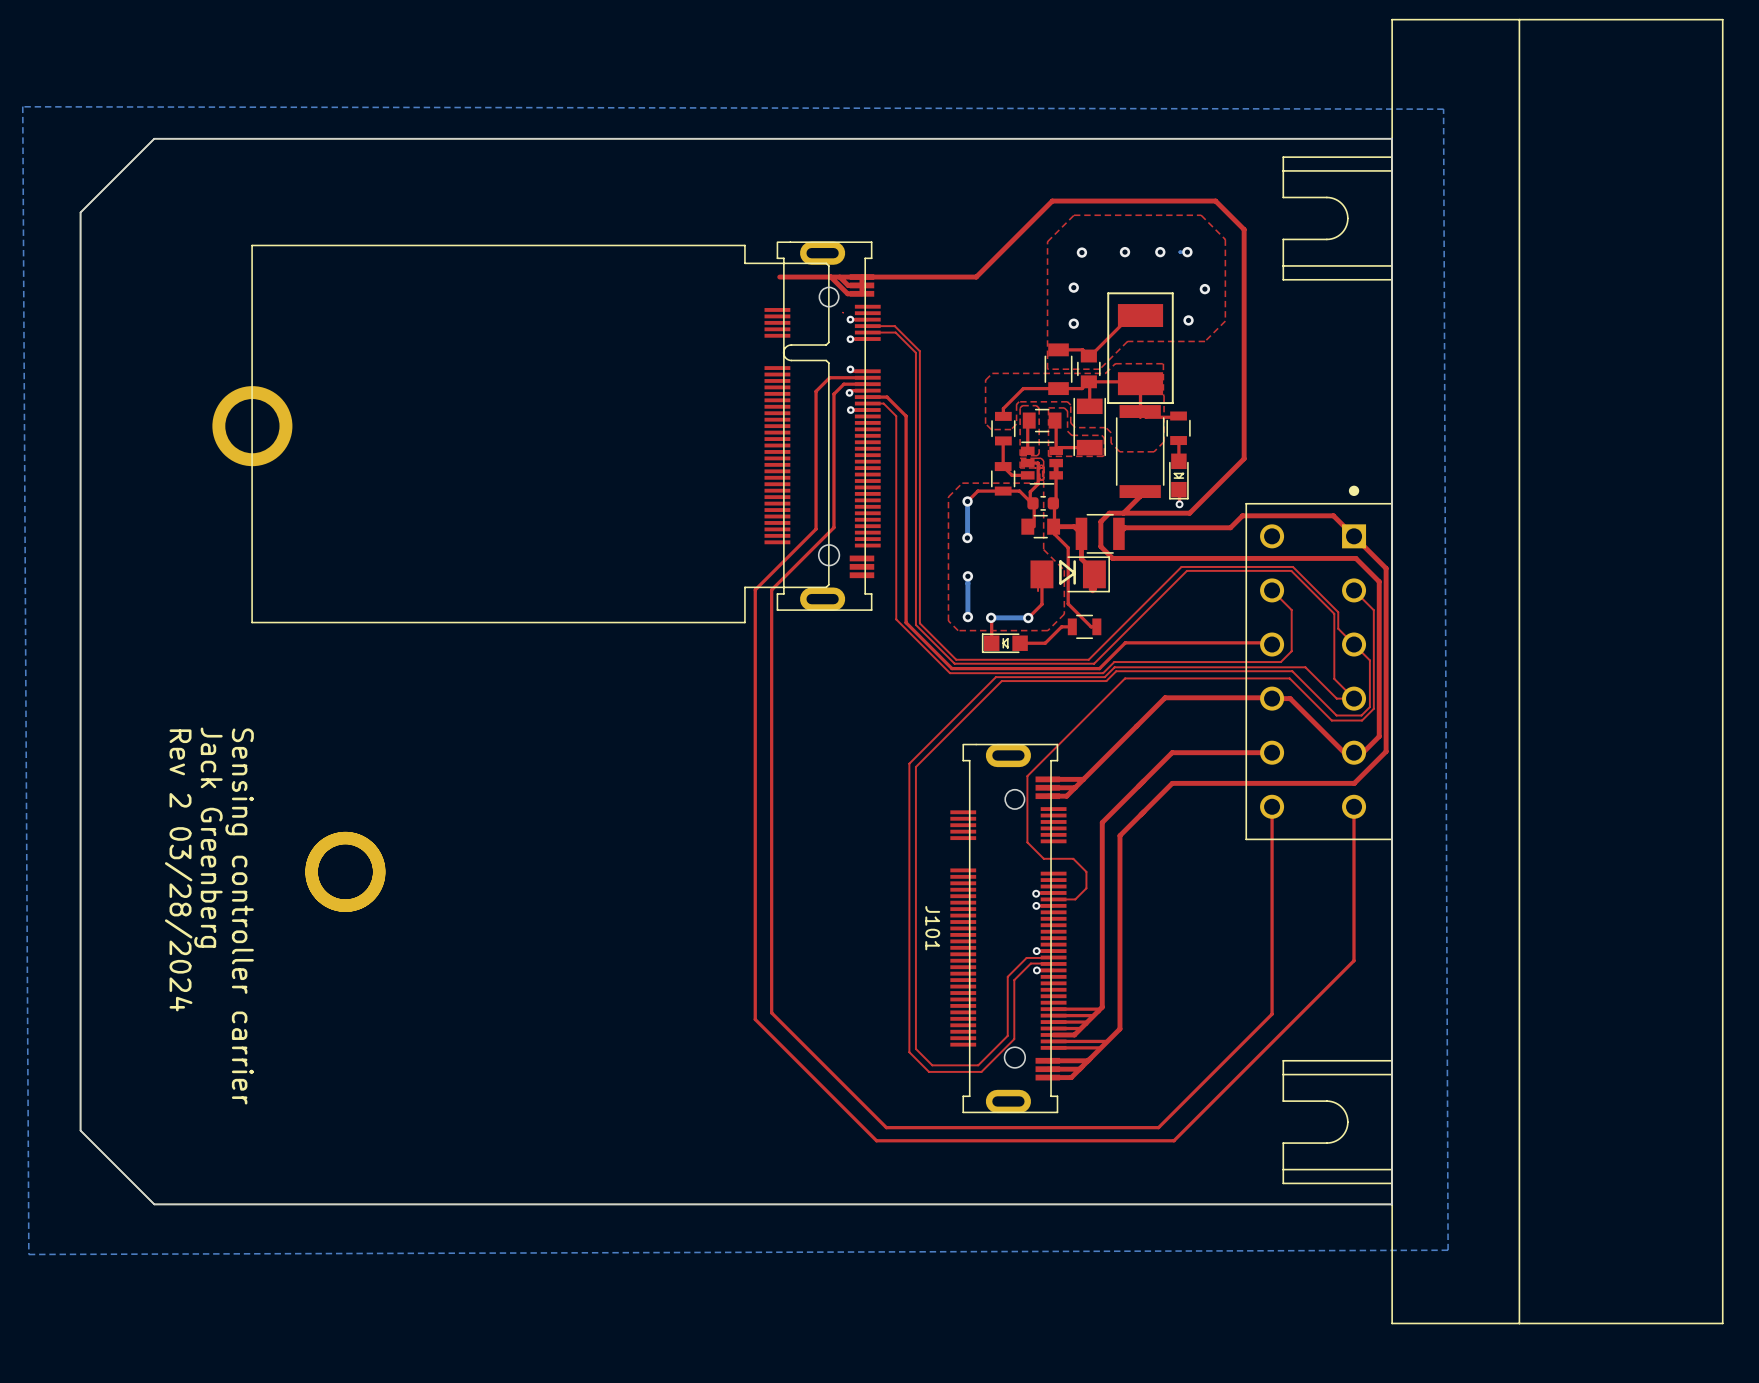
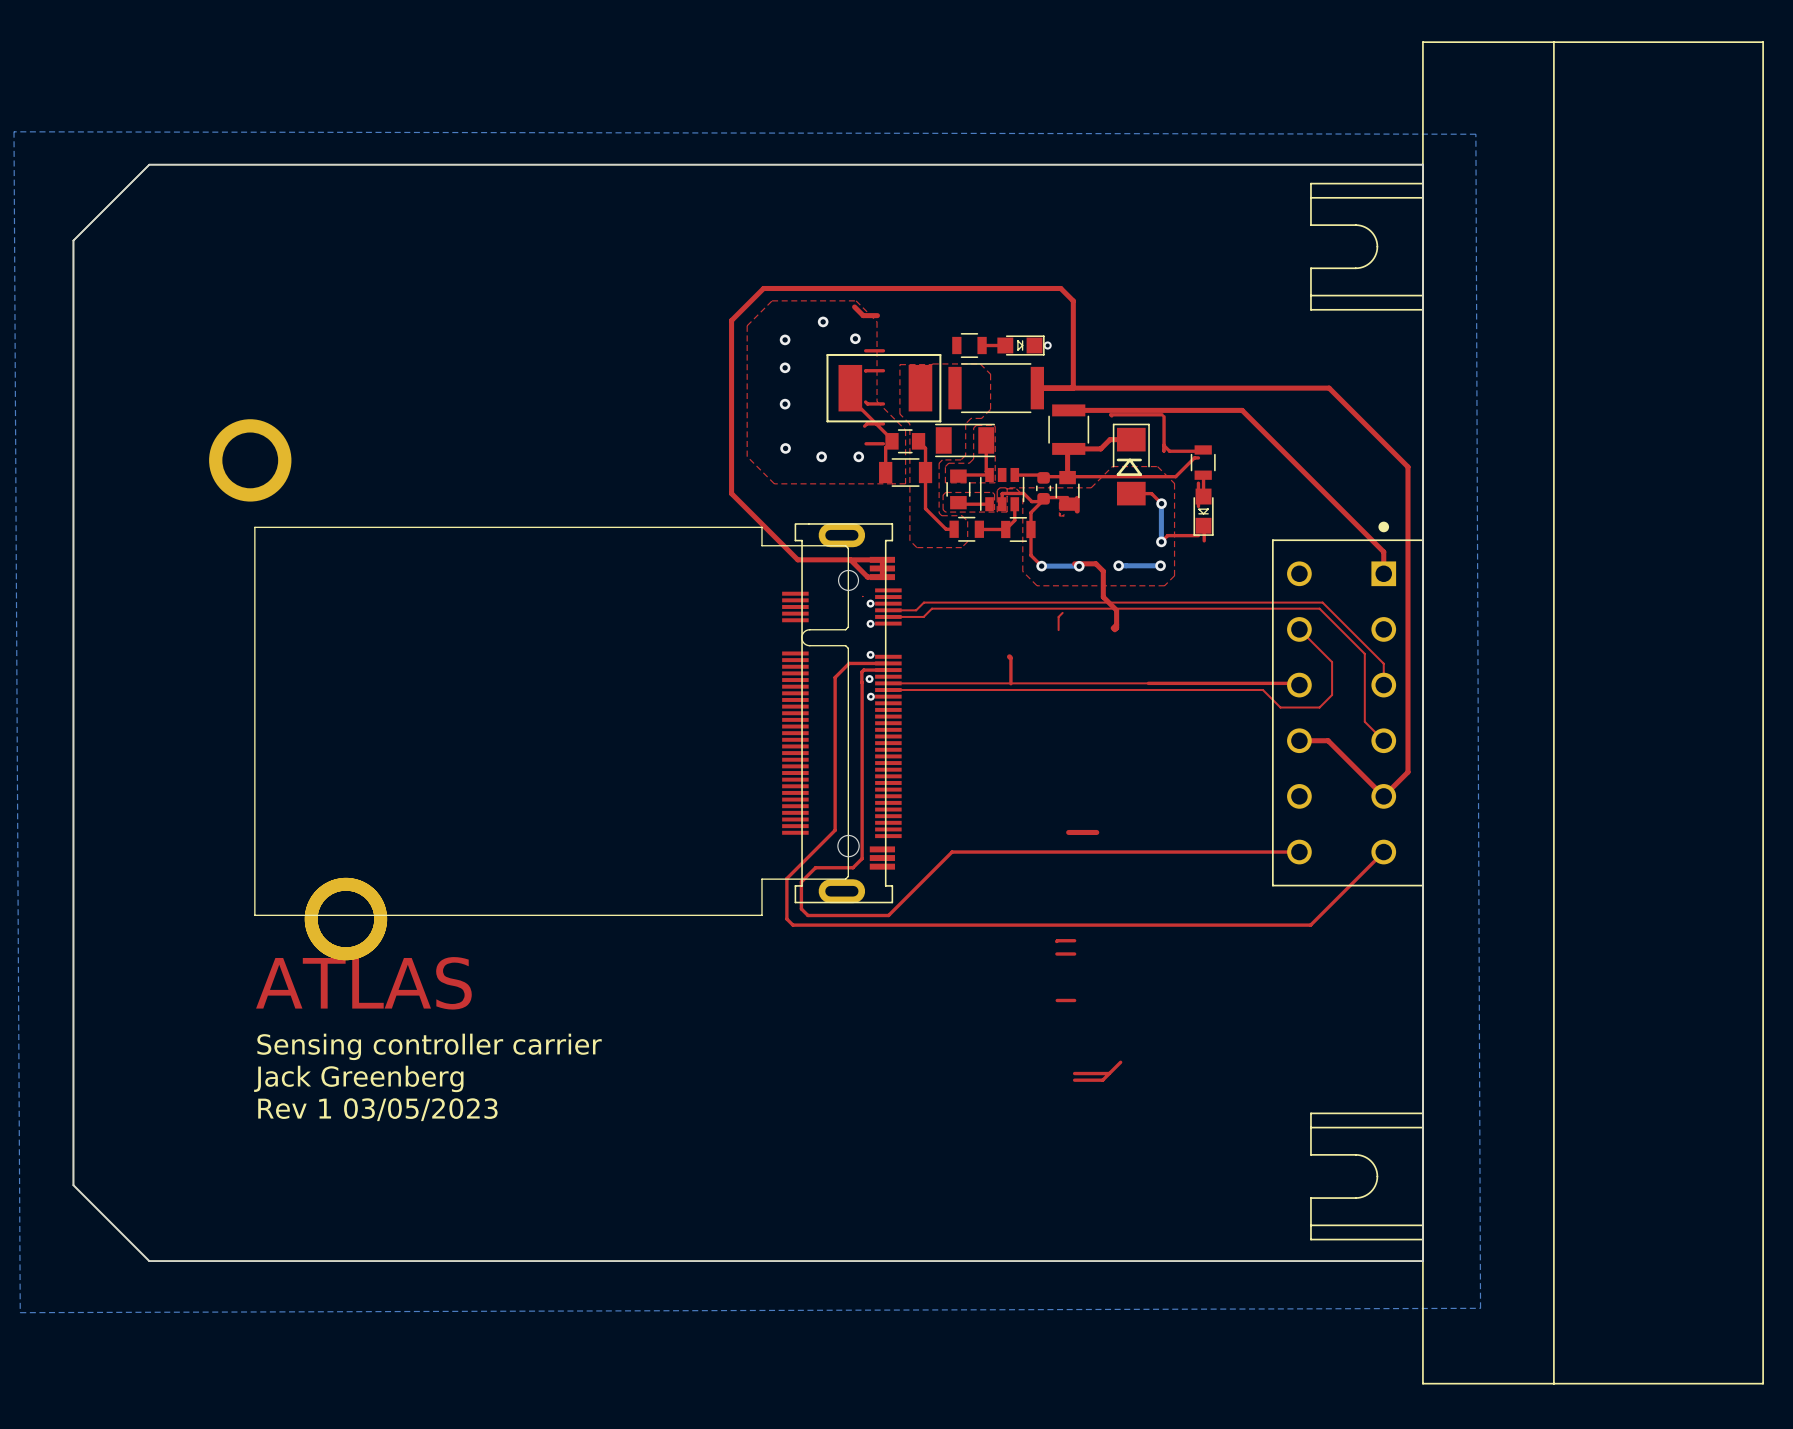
top zone outline: (1074, 215) (1047, 241) (1047, 369) (1099, 369) (1127, 341) (1205, 341) (1225, 321) (1225, 239) (1201, 215) (1074, 215) -> none
line: (252, 245) (744, 245) (744, 263) (826, 263) (828, 265) (828, 342) (826, 345) (789, 345) (785, 348) (783, 352) (785, 357) (789, 360) (826, 360) (828, 363) (828, 584) (826, 587) (744, 587) (744, 622) (252, 622) (252, 245) -> none
via: (1081, 252) -> none
via: (1124, 252) -> none
via: (1160, 252) -> none
bottom track: (1180, 252) (1187, 252) -> none
via: (1187, 252) -> none
top zone outline: none -> (772, 300) (747, 325) (747, 456) (774, 483) (905, 483) (905, 430) (877, 401) (877, 321) (856, 300) (772, 300)
top track: (779, 277) (976, 277) (1052, 201) (1215, 201) (1244, 229) (1244, 458) (1189, 513) (1109, 513) (1100, 521) (1100, 546) (1112, 558) (1355, 558) (1379, 581) (1379, 736) (1363, 752) (1344, 752) (1290, 698) -> (1037, 388) (1329, 388) (1407, 466) (1407, 772) (1383, 796) (1328, 740) (1318, 740)
top track: (830, 277) (847, 293) (861, 293) (861, 277) -> none
via: (1073, 287) -> none
via: (1204, 289) -> none
via: none -> (823, 321)
via: none -> (855, 338)
via: none -> (785, 339)
top zone outline: (842, 313) (842, 313) -> (862, 596) (862, 596)
part: none -> (969, 345)
top track: none -> (982, 345) (1005, 345)
part: none -> (1021, 345)
via: none -> (1047, 345)
top track: (1140, 315) (1130, 315) (1090, 356) (1082, 349) (1058, 349) -> none
via: (850, 319) -> none
via: (1188, 320) -> none
via: (1073, 323) -> none
top track: (867, 326) (894, 326) (919, 351) (919, 623) (956, 659) (1088, 659) (1181, 566) (1293, 566) (1338, 612) (1338, 628) (1369, 660) (1369, 707) (1361, 715) (1336, 715) (1292, 671) (1116, 671) (1106, 681) (1001, 681) (915, 766) (915, 1048) (932, 1065) (978, 1065) (1007, 1035) (1007, 976) (1026, 957) (1053, 957) -> none
top track: (867, 332) (895, 332) (915, 352) (915, 624) (954, 663) (1094, 663) (1186, 570) (1291, 570) (1334, 613) (1335, 680) -> (888, 616) (923, 616) (931, 608) (1319, 608) (1364, 653) (1364, 721)
top zone outline: none -> (932, 363) (980, 363) (990, 374) (990, 409) (981, 418) (970, 418) (965, 423) (965, 455) (961, 459) (942, 459) (939, 463) (939, 513) (941, 515) (962, 515) (967, 521) (967, 541) (961, 547) (916, 547) (909, 540) (909, 424) (899, 414) (899, 364) (932, 363)
via: none -> (785, 367)
via: (850, 339) -> none
part rotation: 0° (1140, 348) -> 90° counterclockwise (883, 388)
part position: (1140, 348) -> (883, 388)
top track: none -> (850, 388) (850, 397) (891, 439) (885, 447) (885, 472)
top track: none -> (1073, 388) (1073, 300) (1060, 288) (763, 288) (731, 320) (731, 493) (797, 559) (882, 559) (882, 577) (867, 577) (850, 559)
top zone outline: (1115, 363) (1105, 373) (992, 373) (985, 380) (985, 423) (991, 429) (1011, 429) (1016, 424) (1016, 404) (1019, 401) (1067, 401) (1070, 405) (1070, 423) (1075, 427) (1105, 427) (1111, 432) (1111, 443) (1119, 451) (1154, 451) (1164, 441) (1163, 363) (1115, 363) -> none
part: (1088, 368) -> none
via: (850, 369) -> none
part rotation: 0° (1058, 369) -> 90° clockwise (905, 472)
part position: (1058, 369) -> (905, 472)
via: none -> (785, 404)
top track: (867, 377) (829, 377) (816, 391) (816, 529) (755, 589) (755, 1019) (876, 1140) (1173, 1140) (1353, 960) (1353, 806) -> (888, 663) (849, 663) (835, 677) (835, 830) (786, 878) (786, 919) (792, 925) (1310, 925) (1383, 852)
top track: none -> (1068, 410) (1242, 410) (1383, 551) (1383, 573)
top track: (867, 384) (843, 384) (833, 394) (833, 527) (771, 589) (771, 1012) (886, 1127) (1158, 1127) (1272, 1014) (1272, 806) -> (888, 670) (863, 670) (861, 672) (862, 858) (853, 867) (815, 867) (801, 881) (801, 908) (807, 915) (888, 915) (952, 852) (1299, 852)
via: (849, 392) -> none
top zone outline: none -> (976, 425) (973, 428) (973, 458) (969, 463) (948, 463) (945, 466) (945, 482) (995, 482) (995, 426) (976, 425)
top track: (867, 397) (887, 397) (906, 416) (906, 622) (952, 668) (1099, 668) (1125, 642) -> (888, 683) (1148, 683)
top track: (867, 403) (883, 403) (896, 416) (896, 619) (950, 673) (1103, 673) (1114, 662) (1280, 662) (1291, 651) (1291, 610) -> (888, 690) (1262, 690) (1280, 707) (1319, 707) (1332, 695) (1332, 662) (1319, 649)
top track: none -> (1133, 437) (1131, 439) (1110, 439) (1100, 448) (1068, 448) (1067, 477)
top zone outline: (1022, 405) (1020, 407) (1020, 455) (1037, 455) (1039, 453) (1039, 408) (1036, 405) (1022, 405) -> none
top track: (1089, 406) (1088, 381) (1082, 388) (1023, 388) (1003, 408) (1003, 416) (999, 416) -> none
part: none -> (905, 441)
top track: none -> (918, 441) (925, 448) (925, 508) (946, 529) (954, 529) (954, 533)
top zone outline: (1048, 407) (1048, 456) (1104, 455) (1104, 437) (1101, 435) (1071, 435) (1067, 431) (1067, 411) (1064, 407) (1048, 407) -> none
top track: none -> (989, 443) (986, 440) (986, 471) (989, 474) (958, 476)
via: (850, 410) -> none
via: none -> (785, 448)
top track: (1029, 420) (1027, 450) -> none
part: (1042, 420) -> none
top track: (1055, 420) (1056, 450) (1059, 447) (1089, 447) (1086, 450) -> none
via: none -> (821, 456)
via: none -> (858, 456)
top track: none -> (1198, 457) (1194, 457) (1175, 476) (1014, 475)
part position: (822, 426) -> (841, 713)
part rotation: 0° (1089, 426) -> 90° clockwise (964, 440)
part position: (1089, 426) -> (964, 440)
part: (1003, 428) -> none
top zone outline: none -> (1112, 466) (1091, 487) (999, 487) (997, 490) (997, 512) (1007, 512) (1007, 488) (1016, 488) (1022, 495) (1022, 571) (1037, 585) (1164, 585) (1174, 575) (1174, 483) (1157, 466) (1112, 466)
top track: (1003, 440) (1003, 466) (1011, 475) (1027, 475) -> none
part footprint: [1020, 441, 1063, 485] -> [1055, 470, 1080, 511]
top track: none -> (1198, 483) (1198, 506)
part rotation: 0° (1140, 451) -> 90° clockwise (996, 388)
part position: (1140, 451) -> (996, 388)
top zone outline: none -> (1005, 487) (1007, 489)
part: none -> (958, 489)
part: none -> (1002, 489)
top zone outline: none -> (945, 492) (943, 495) (943, 509) (945, 512) (994, 512) (994, 494) (992, 492) (945, 492)
top zone outline: (1020, 458) (1020, 467) (1042, 467) (1042, 477) (1036, 483) (962, 483) (948, 497) (948, 620) (958, 630) (1047, 630) (1064, 614) (1064, 570) (1043, 549) (1043, 460) (1041, 458) (1020, 458) -> none
top track: none -> (1133, 493) (1131, 493) (1151, 493) (1161, 503)
top track: none -> (1067, 497) (1047, 497) (1043, 501) (1031, 501) (1023, 493) (1002, 493) (1002, 504)
top track: (1027, 463) (1038, 463) (1038, 484) (1030, 492) (1030, 503) (1034, 507) (1034, 526) -> none
top track: none -> (1041, 501) (1030, 512) (1030, 555) (1041, 566)
top track: none -> (958, 502) (989, 504)
top track: none -> (1014, 504) (1014, 520) (1005, 529) (979, 529)
bottom track: none -> (1161, 503) (1161, 541)
via: none -> (1161, 503)
top track: (1056, 475) (1054, 534) (1068, 547) (1068, 603) (1091, 626) (1096, 626) -> none
part rotation: 0° (1003, 478) -> 90° clockwise (1018, 529)
line: none -> (254, 527) (761, 527) (761, 545) (845, 545) (848, 548) (848, 627) (845, 629) (807, 629) (803, 633) (801, 637) (803, 643) (807, 645) (845, 645) (848, 648) (848, 876) (845, 879) (761, 879) (761, 915) (254, 915) (254, 527)
top track: (1140, 491) (1140, 496) (1123, 513) -> none
part: none -> (966, 529)
top track: none -> (1198, 535) (1167, 535) (1160, 542)
top track: (967, 501) (977, 491) (1019, 491) (1030, 501) -> none
bottom track: (967, 501) (967, 537) -> none
via: (967, 501) -> none
part rotation: 0° (1043, 503) -> 90° clockwise (1043, 488)
part position: (1043, 503) -> (1043, 488)
via: (1179, 504) -> none
via: none -> (1161, 541)
part: (1040, 526) -> none
bottom track: none -> (1041, 566) (1079, 566)
via: none -> (1041, 566)
bottom track: none -> (1118, 565) (1160, 565)
via: none -> (1118, 565)
via: none -> (1160, 565)
via: none -> (1079, 566)
part rotation: 0° (1100, 533) -> 90° clockwise (1068, 429)
part position: (1100, 533) -> (1068, 429)
top track: (1118, 533) (1124, 527) (1230, 527) (1242, 515) (1333, 515) (1386, 568) (1386, 751) (1354, 783) (1172, 783) (1119, 835) (1119, 1028) (1071, 1077) (1047, 1077) -> none
via: (967, 537) -> none
via: none -> (870, 603)
top track: none -> (888, 610) (916, 610) (923, 602) (1322, 602) (1383, 663) (1383, 685)
part rotation: 0° (1070, 574) -> 90° counterclockwise (1131, 464)
part position: (1070, 574) -> (1131, 464)
bottom track: (967, 576) (967, 617) -> none
via: (967, 576) -> none
top track: (1041, 584) (1041, 574) (1041, 604) (1028, 618) -> none
via: none -> (870, 623)
top track: (1354, 590) (1373, 610) (1373, 708) (1362, 720) (1331, 720) (1289, 678) (1125, 678) (1027, 776) (1027, 842) (1043, 858) (1073, 858) (1086, 871) (1086, 888) (1075, 899) (1053, 899) -> none
via: none -> (870, 654)
via: (967, 617) -> none
bottom track: (991, 617) (1028, 617) -> none
via: (991, 617) -> none
via: (1028, 618) -> none
top track: (1072, 626) (1061, 626) (1045, 643) (1020, 643) -> none
part: (1084, 626) -> none
via: none -> (869, 679)
part: (1004, 643) -> none
via: none -> (870, 696)
top track: (1272, 698) (1165, 697) (1066, 796) (1047, 796) -> none
top track: (1354, 698) (1336, 698) (1305, 667) (1114, 667) (1104, 677) (995, 677) (909, 763) (909, 1052) (929, 1071) (981, 1071) (1014, 1039) (1014, 980) (1030, 963) (1053, 963) -> none
top track: (1272, 752) (1172, 752) (1102, 822) (1102, 1007) (1074, 1034) (1053, 1034) -> none
top track: (1047, 779) (1083, 779) -> none
text rotation: 0° (208, 837) -> 90° counterclockwise (358, 1078)
text: Rev 2 03/28/2024 (178, 870) -> none
via: (1036, 893) -> none
via: (1036, 905) -> none
text rotation: 0° (239, 916) -> 90° counterclockwise (429, 1046)
J101: (1008, 928) -> none
text: none -> ATLAS (363, 983)
via: (1036, 951) -> none
via: (1036, 970) -> none
top track: (1053, 1009) (1100, 1009) -> none
top track: (1053, 1015) (1093, 1015) -> none
top track: (1053, 1041) (1107, 1041) -> none
top track: (1053, 1047) (1101, 1047) -> none
text: none -> Rev 1 03/05/2023 (377, 1109)
top track: (1047, 1060) (1088, 1060) -> none
top track: (1047, 1069) (1079, 1069) -> none

